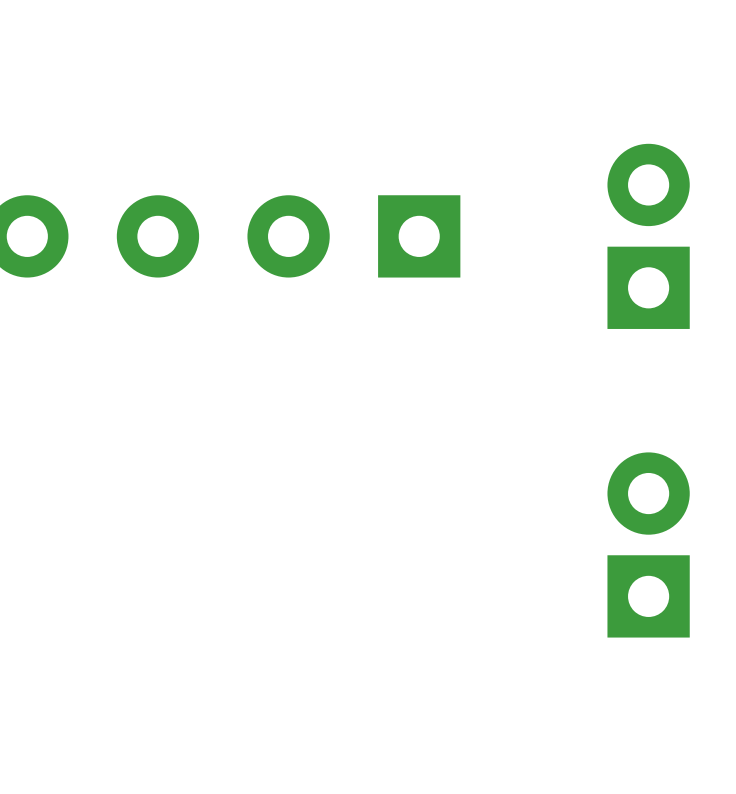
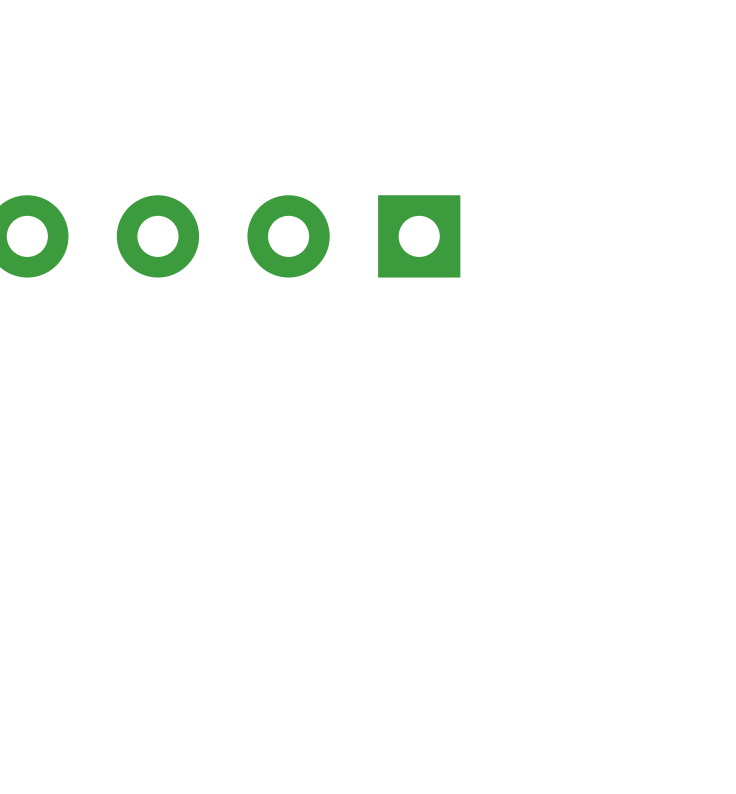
part: (648, 236) -> none
part: (648, 544) -> none

